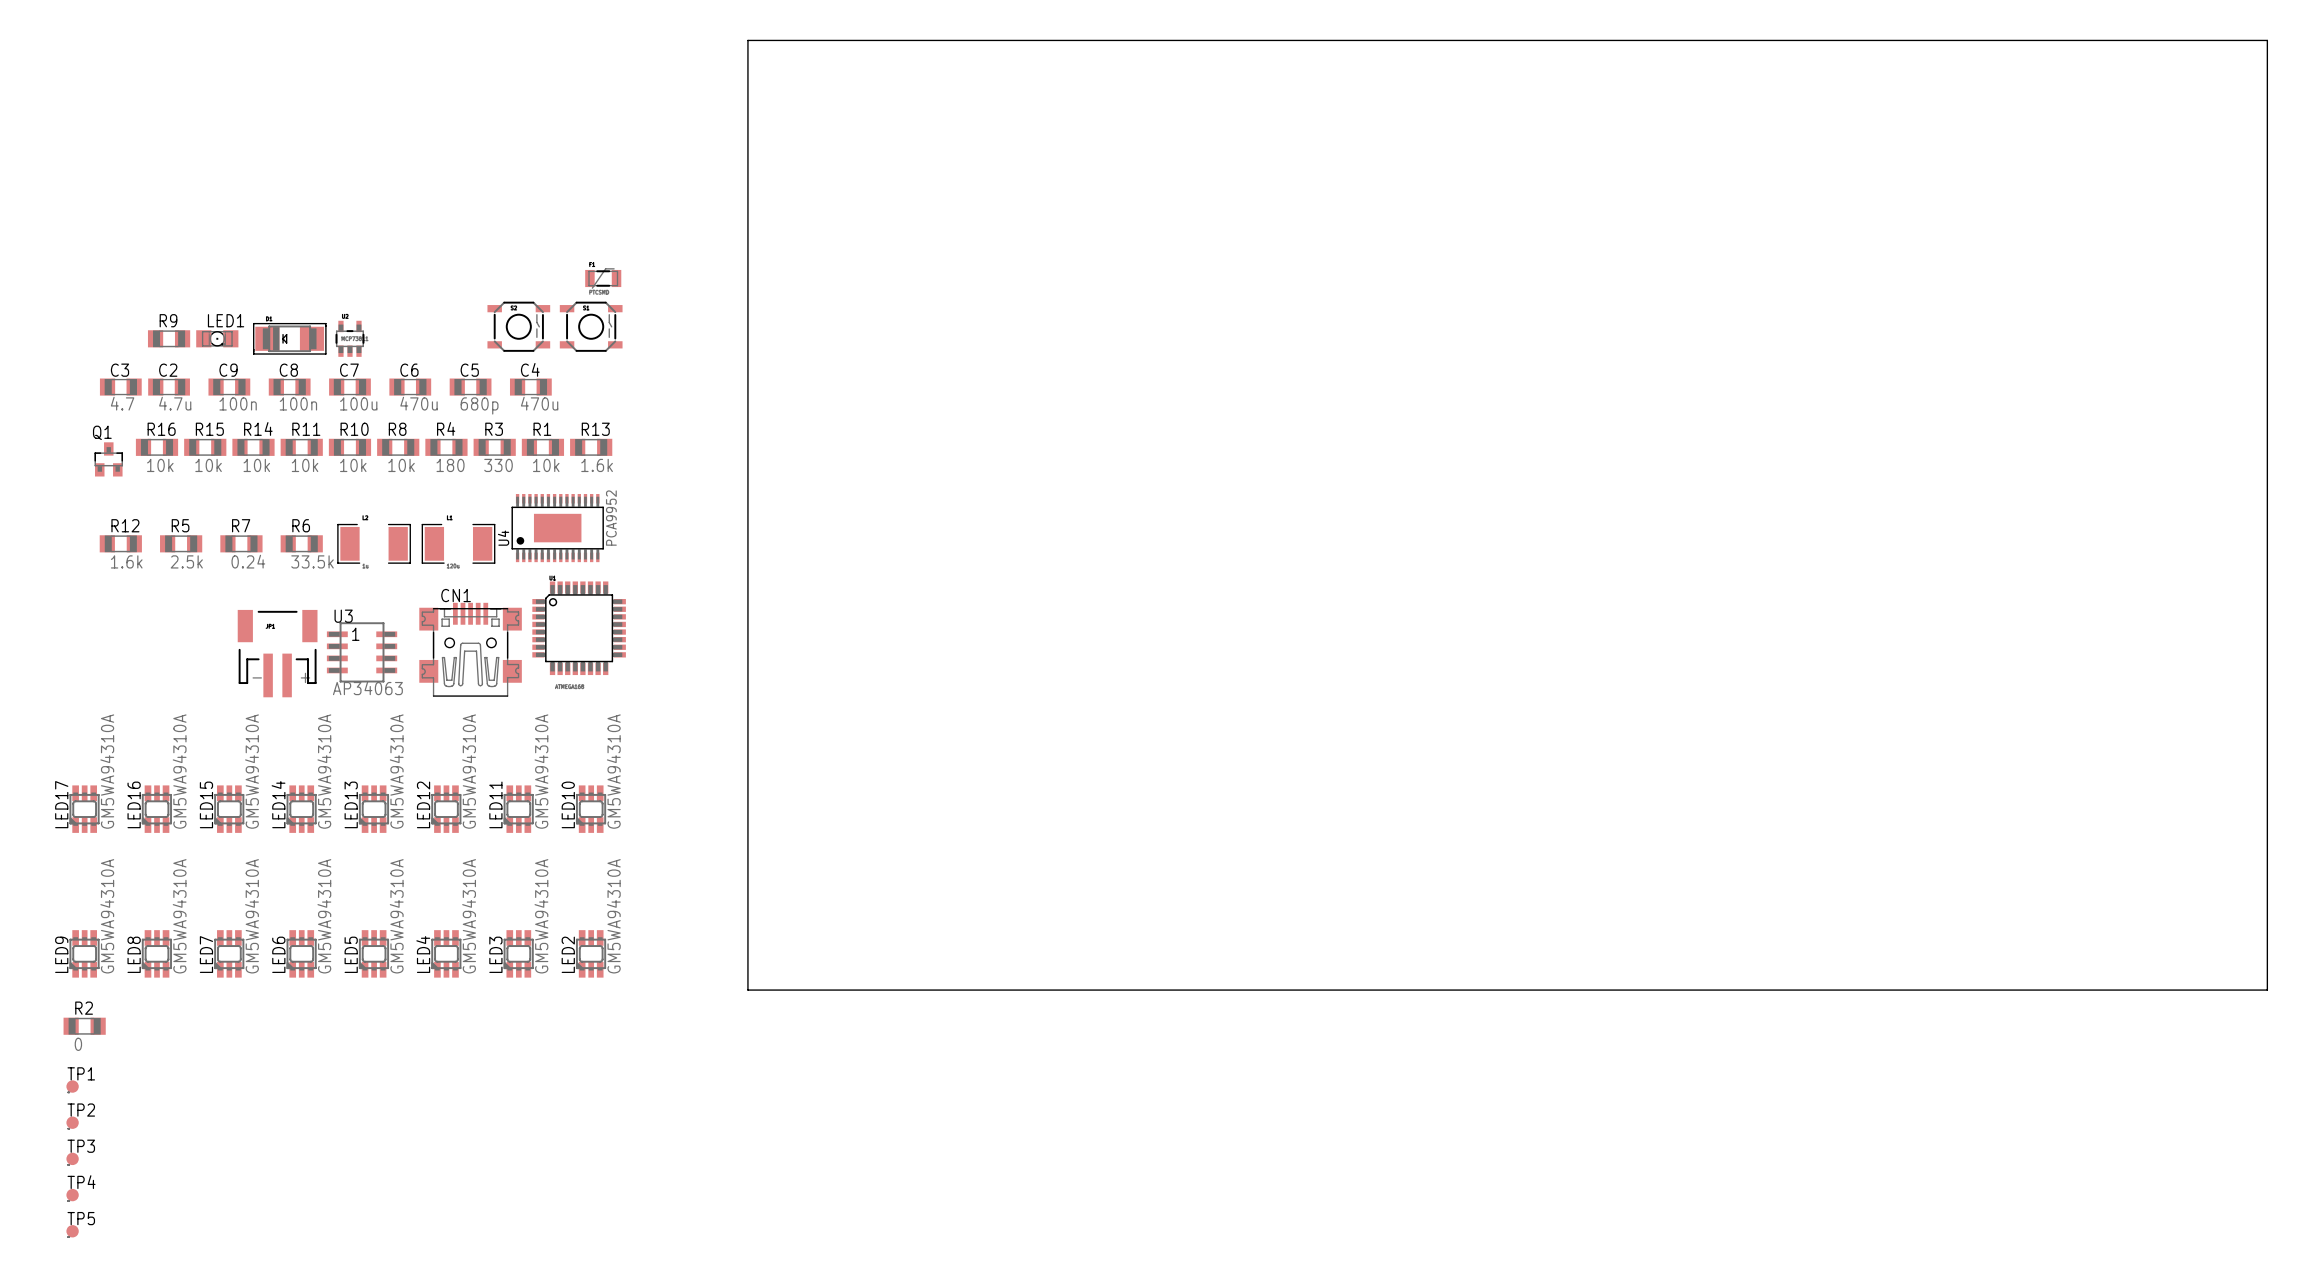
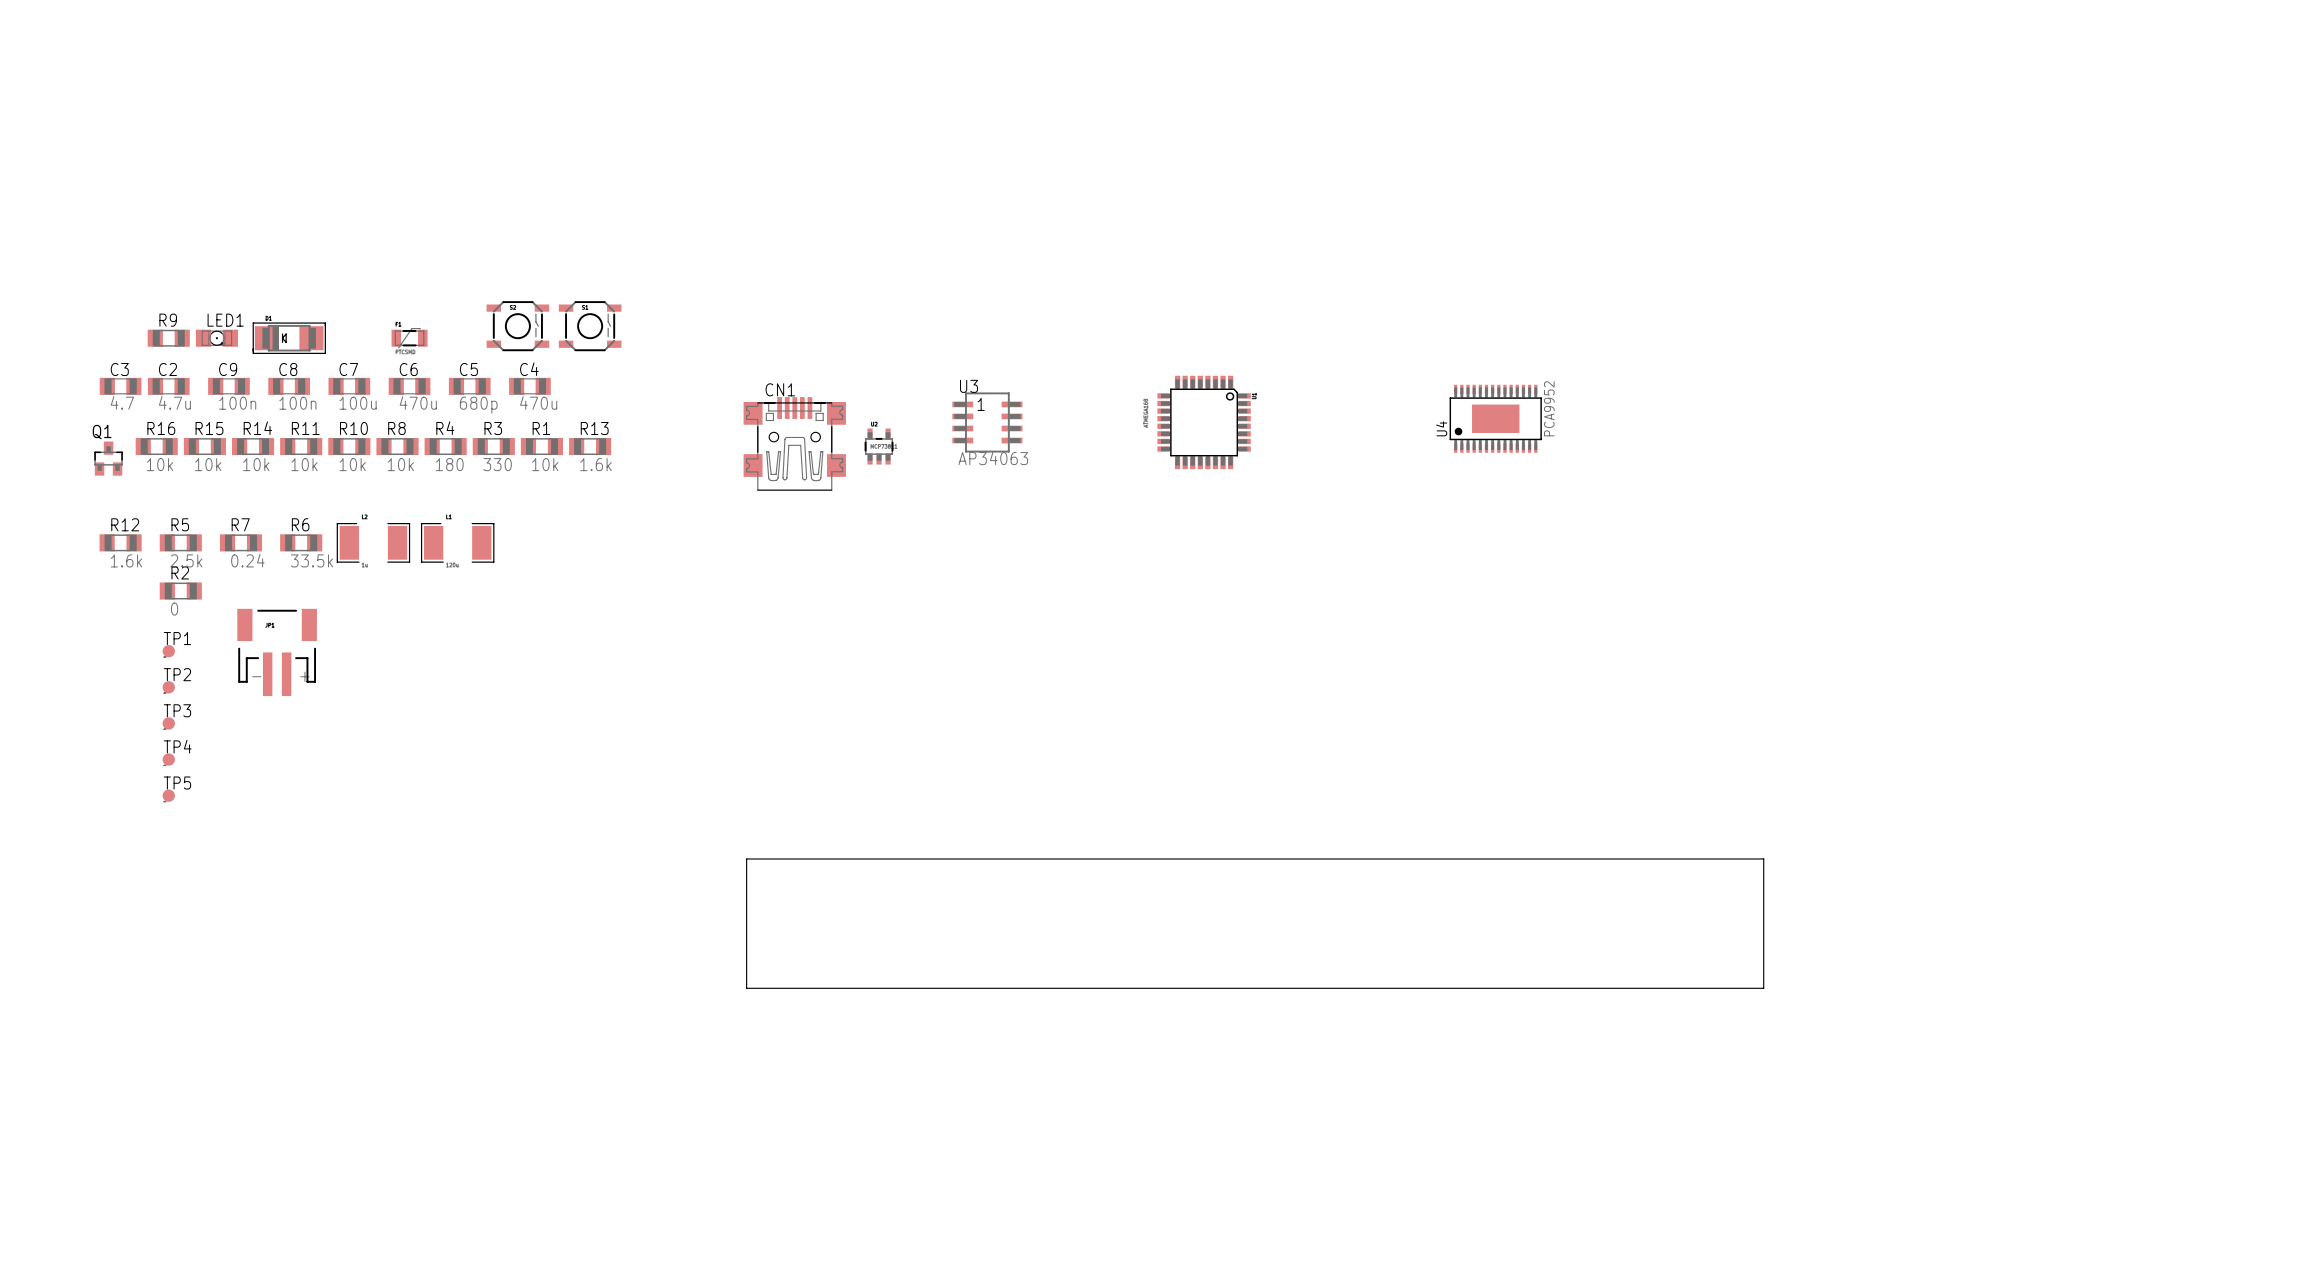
part position: (603, 278) -> (409, 338)
part position: (349, 338) -> (879, 446)
U4 position: (557, 528) -> (1495, 418)
part rotation: 0° (579, 628) -> 90° clockwise (1204, 422)
part position: (579, 628) -> (1204, 422)
CN1 position: (470, 649) -> (794, 443)
U3 position: (362, 652) -> (987, 422)
LED17: GM5WA94310A (84, 809) -> none
LED16: GM5WA94310A (156, 809) -> none
LED15: GM5WA94310A (229, 809) -> none
LED14: GM5WA94310A (301, 809) -> none
LED13: GM5WA94310A (373, 809) -> none
LED12: GM5WA94310A (446, 809) -> none
LED11: GM5WA94310A (518, 809) -> none
LED10: GM5WA94310A (591, 809) -> none
board edge: (747, 860) (747, 40) (2267, 40) (2267, 990) (1766, 990) -> (746, 858) (1763, 858) (1763, 988)
LED9: GM5WA94310A (84, 953) -> none
LED8: GM5WA94310A (156, 953) -> none
LED7: GM5WA94310A (229, 953) -> none
LED6: GM5WA94310A (301, 953) -> none
LED5: GM5WA94310A (373, 953) -> none
LED4: GM5WA94310A (446, 953) -> none
LED3: GM5WA94310A (518, 953) -> none
LED2: GM5WA94310A (591, 953) -> none
R2 position: (84, 1026) -> (180, 591)
TP1 position: (72, 1086) -> (168, 651)
TP2 position: (72, 1122) -> (168, 687)
TP3 position: (72, 1158) -> (168, 723)
TP4 position: (72, 1195) -> (168, 759)
TP5 position: (72, 1231) -> (168, 795)

